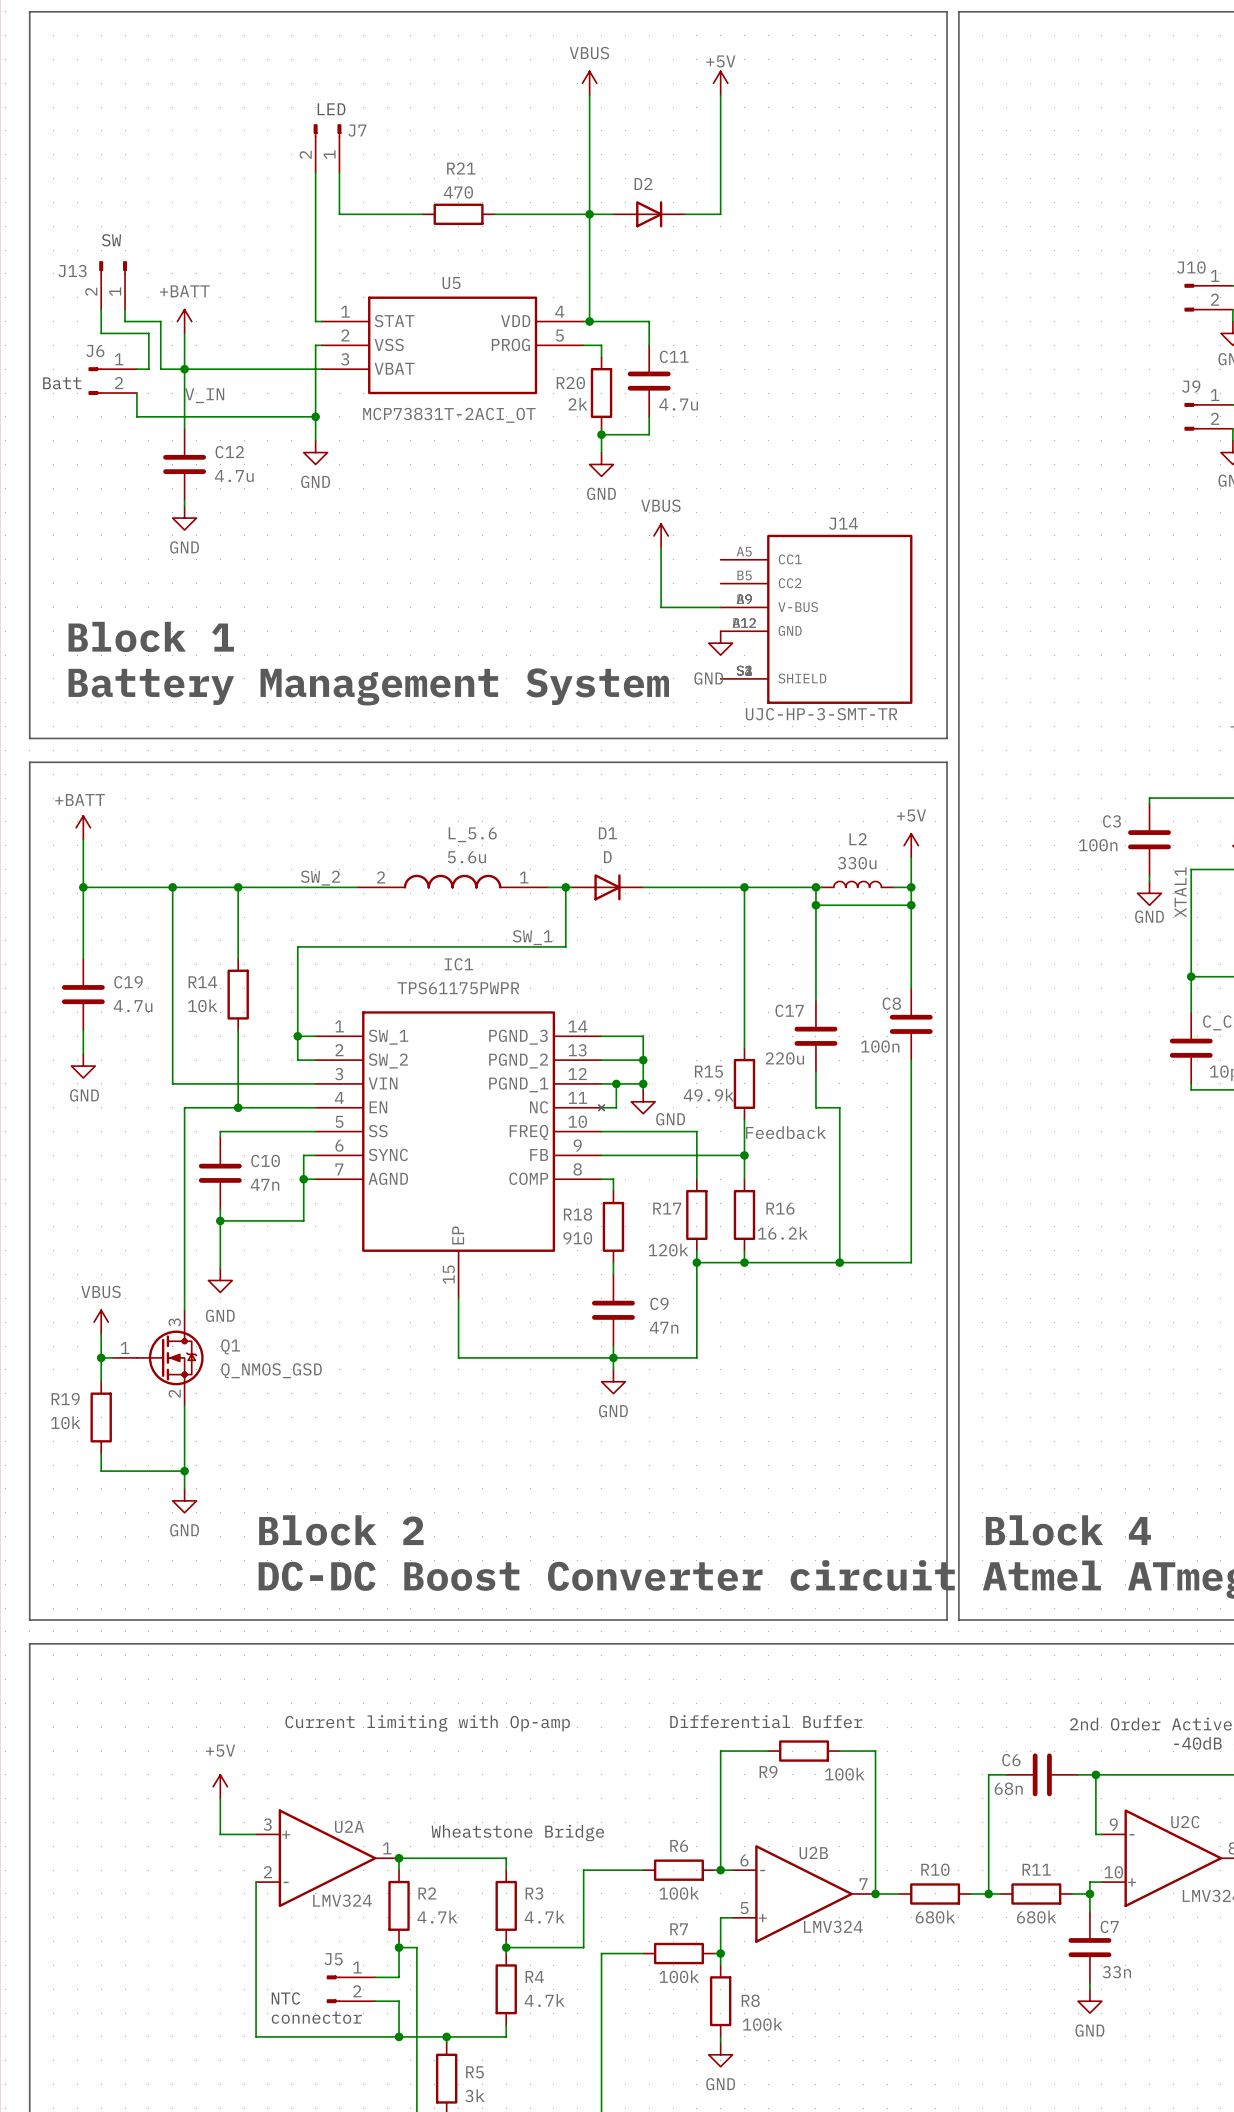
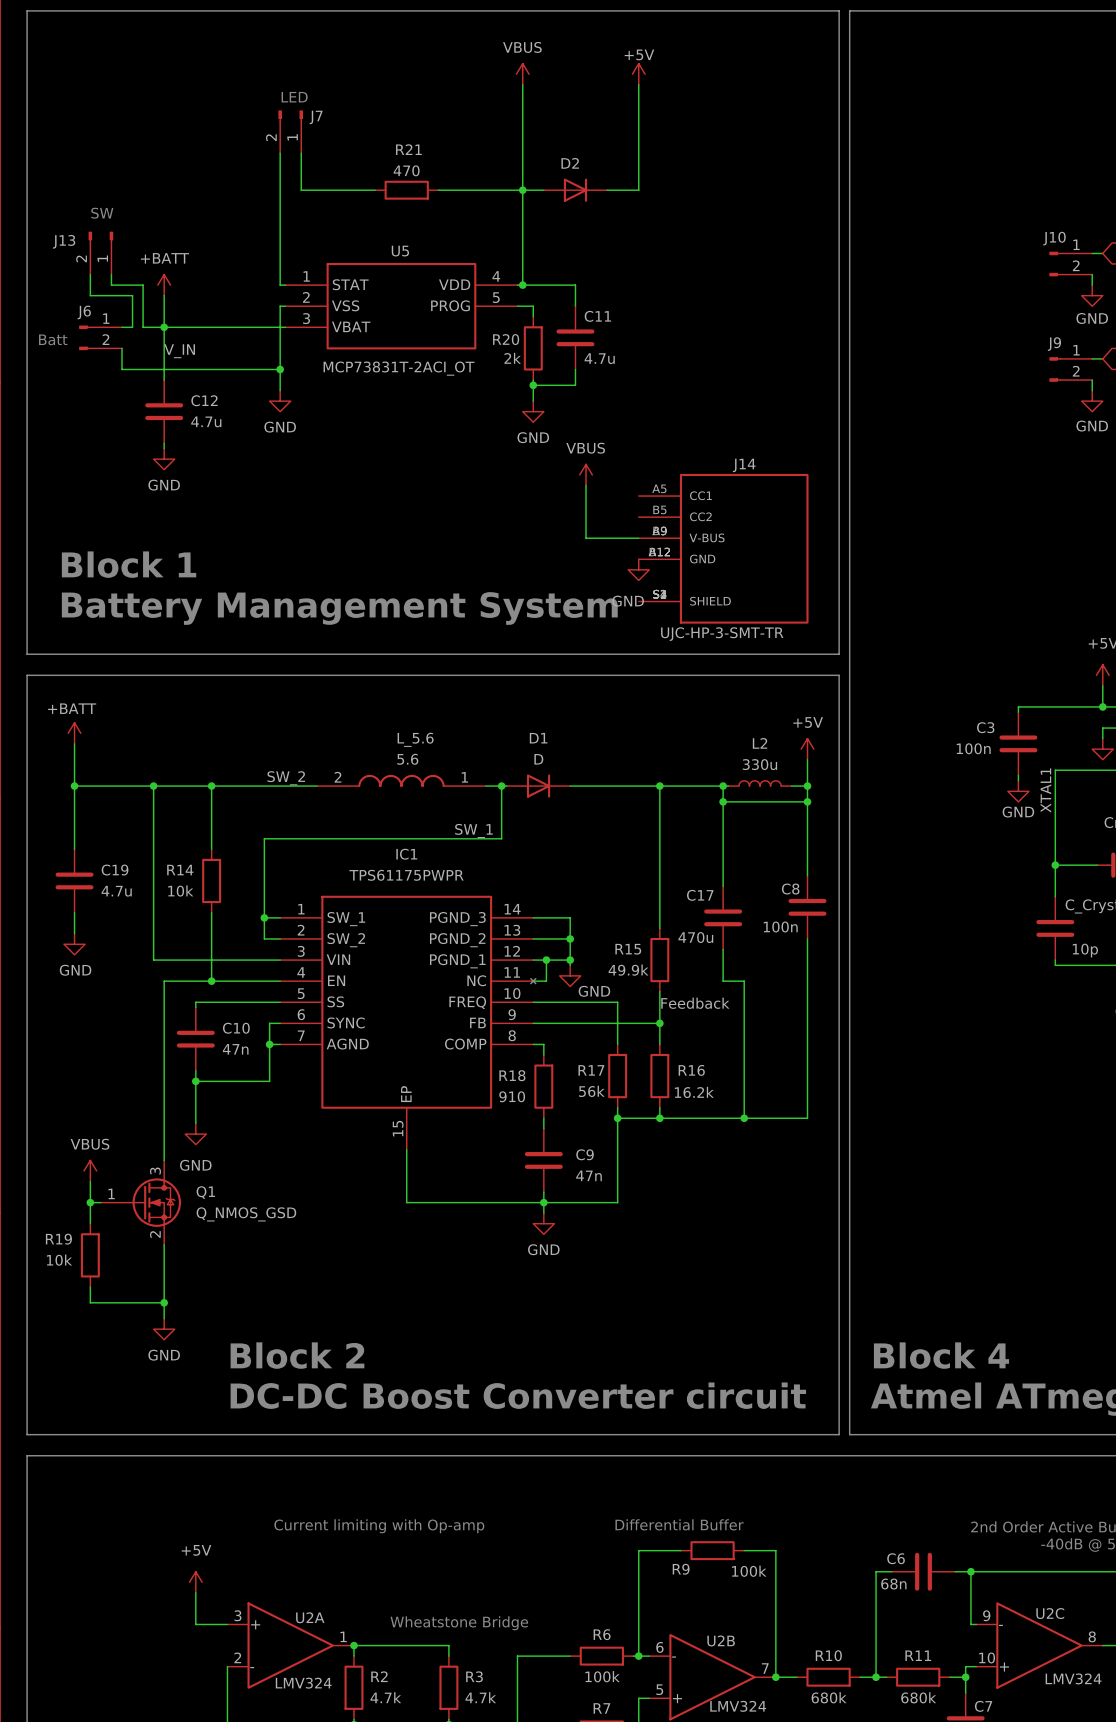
L_5.6 value: 5.6u (466, 857) -> 5.6 (407, 759)
C17 value: 220u (784, 1058) -> 470u (695, 937)
R17 value: 120k (668, 1250) -> 56k (591, 1091)

